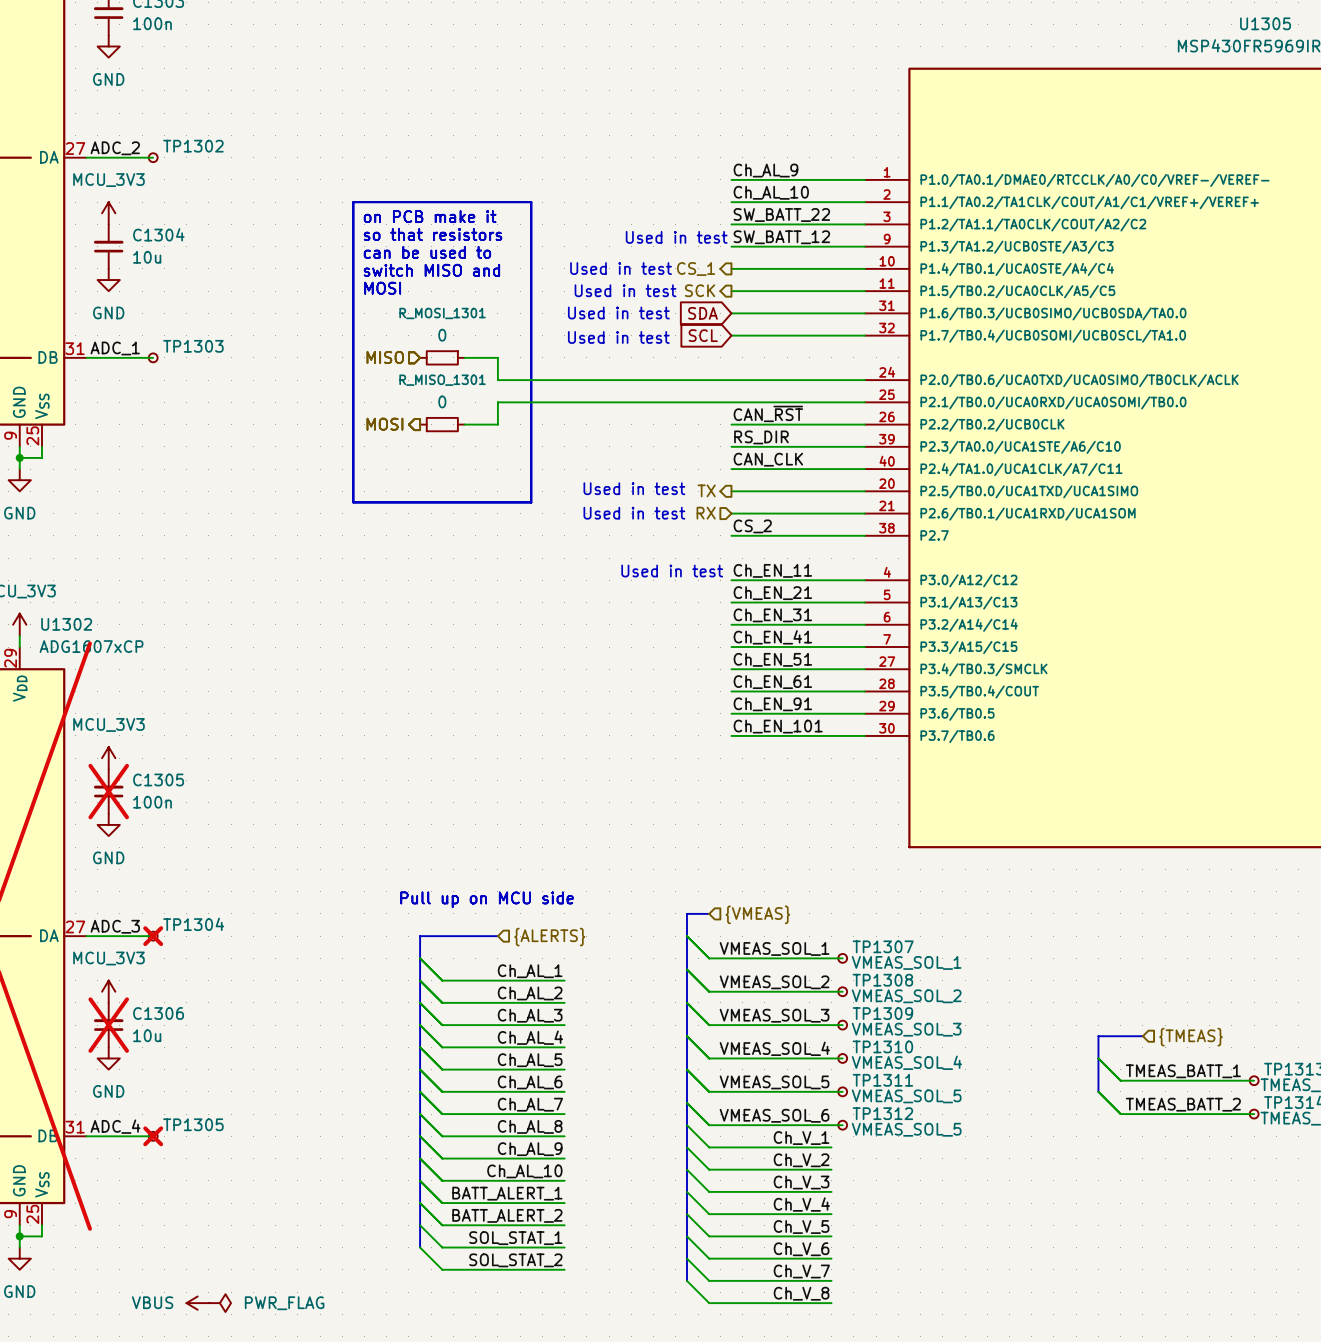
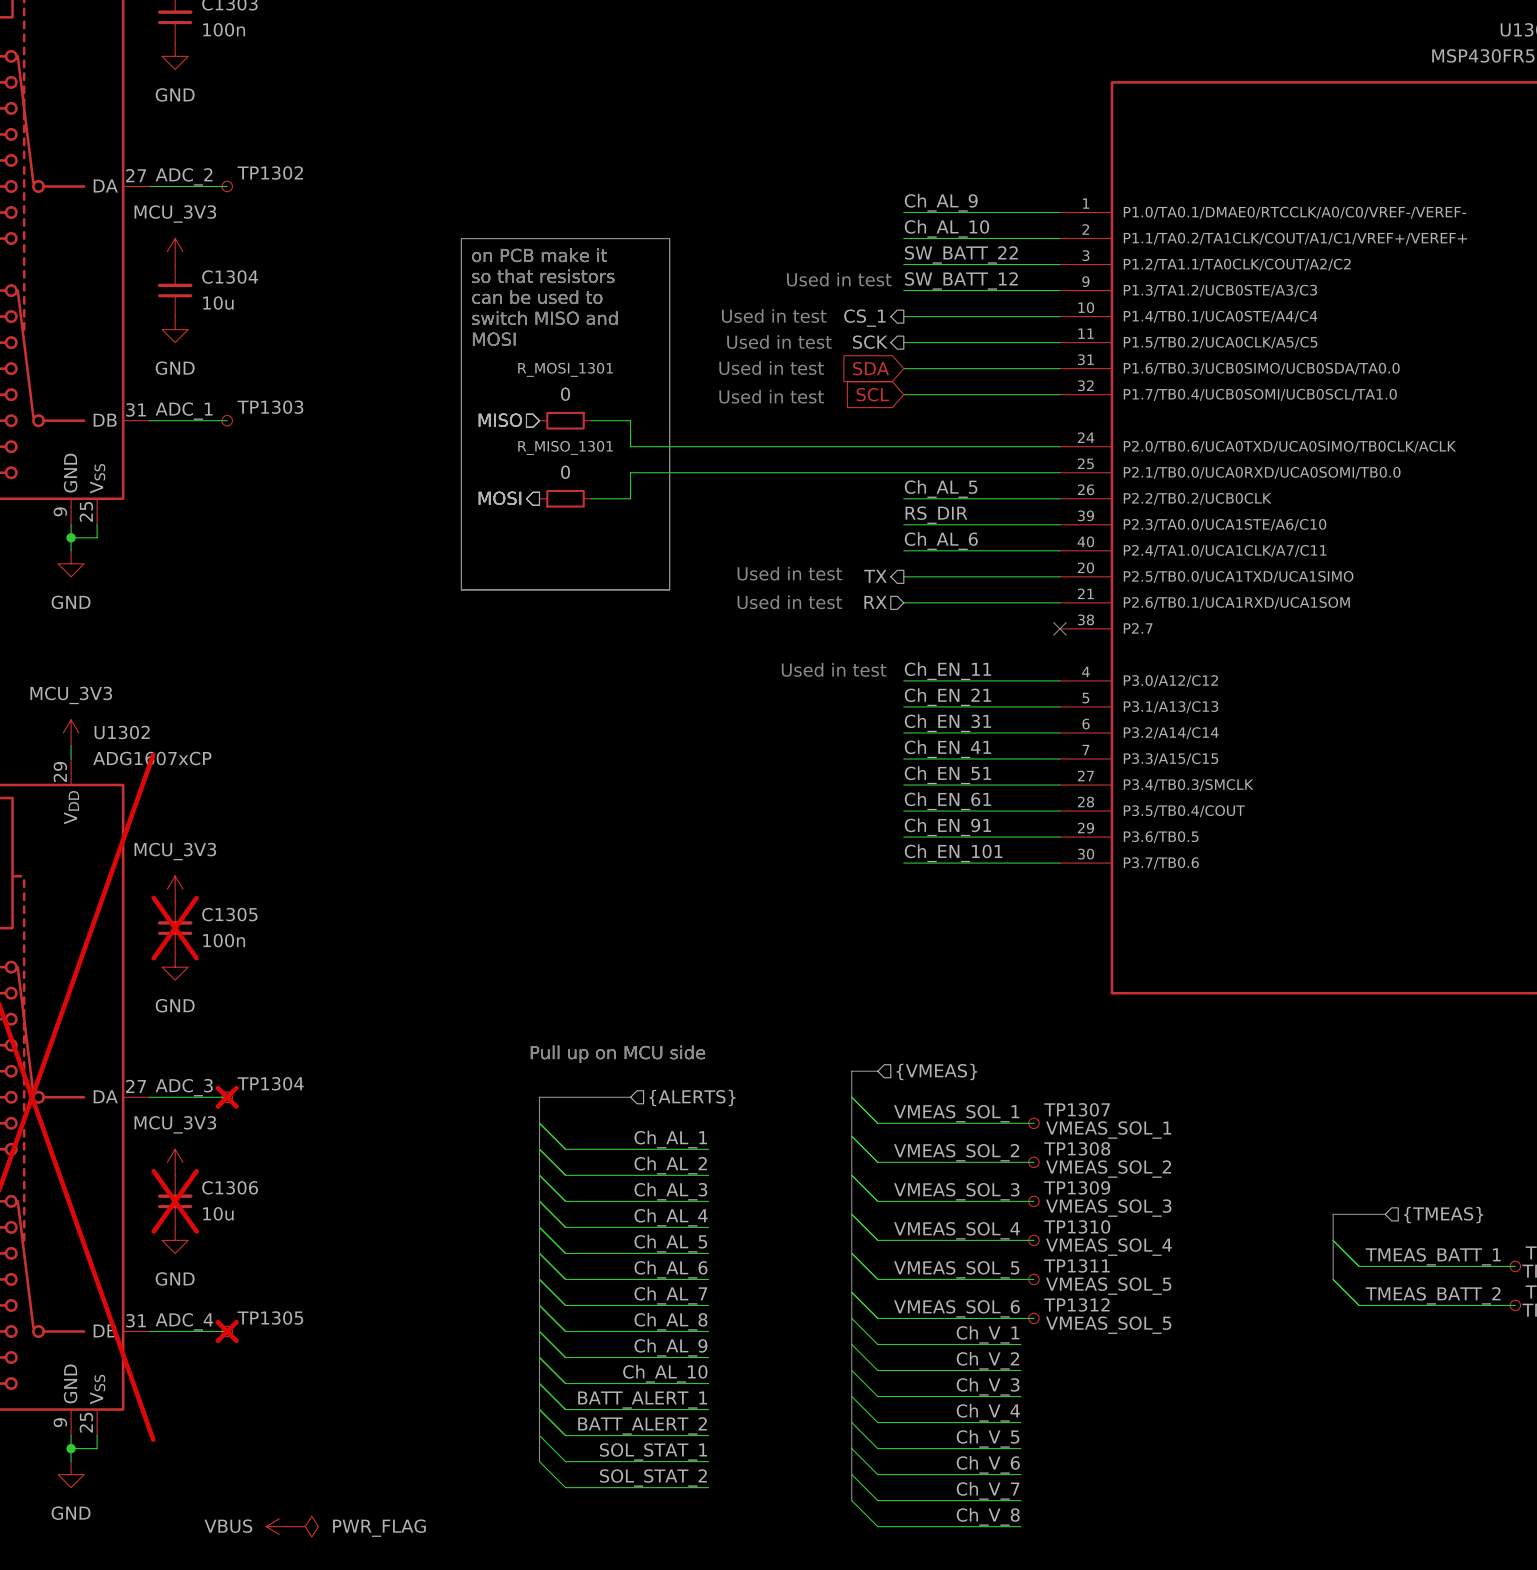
label: CAN_~{RST} (768, 413) -> Ch_AL_5 (941, 488)
label: CAN_CLK (768, 459) -> Ch_AL_6 (941, 541)
label: CS_2 (752, 526) -> none
wire: (731, 535) (864, 535) -> none
no-connect mark: none -> (1059, 628)

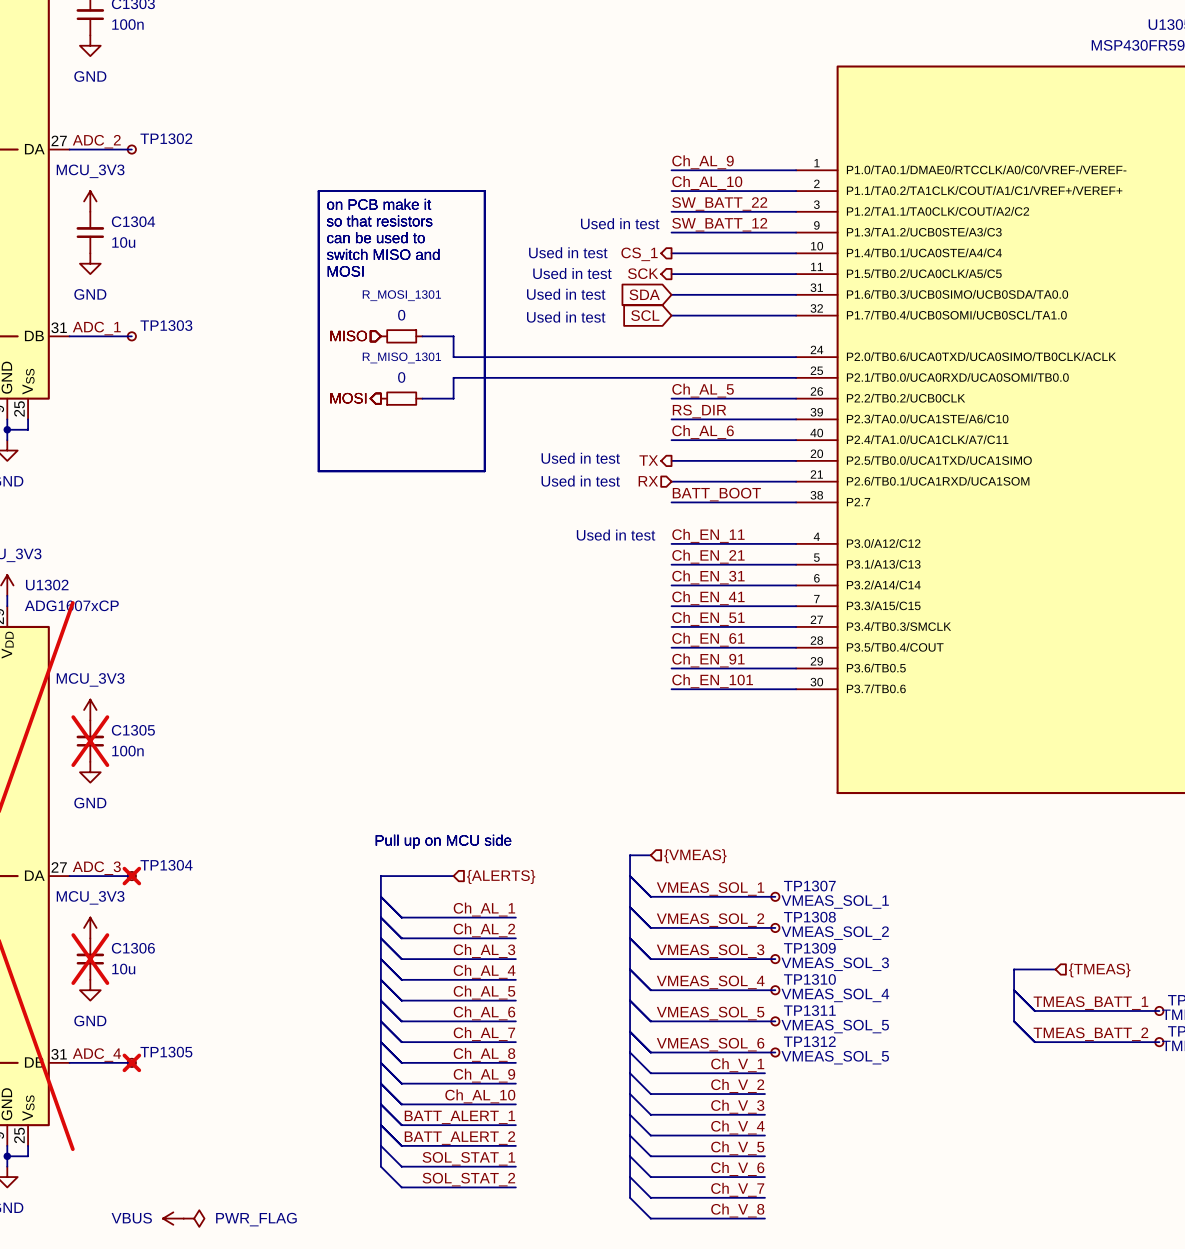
label: none -> BATT_BOOT (716, 494)
wire: none -> (671, 502) (796, 502)
no-connect mark: (1059, 628) -> none

